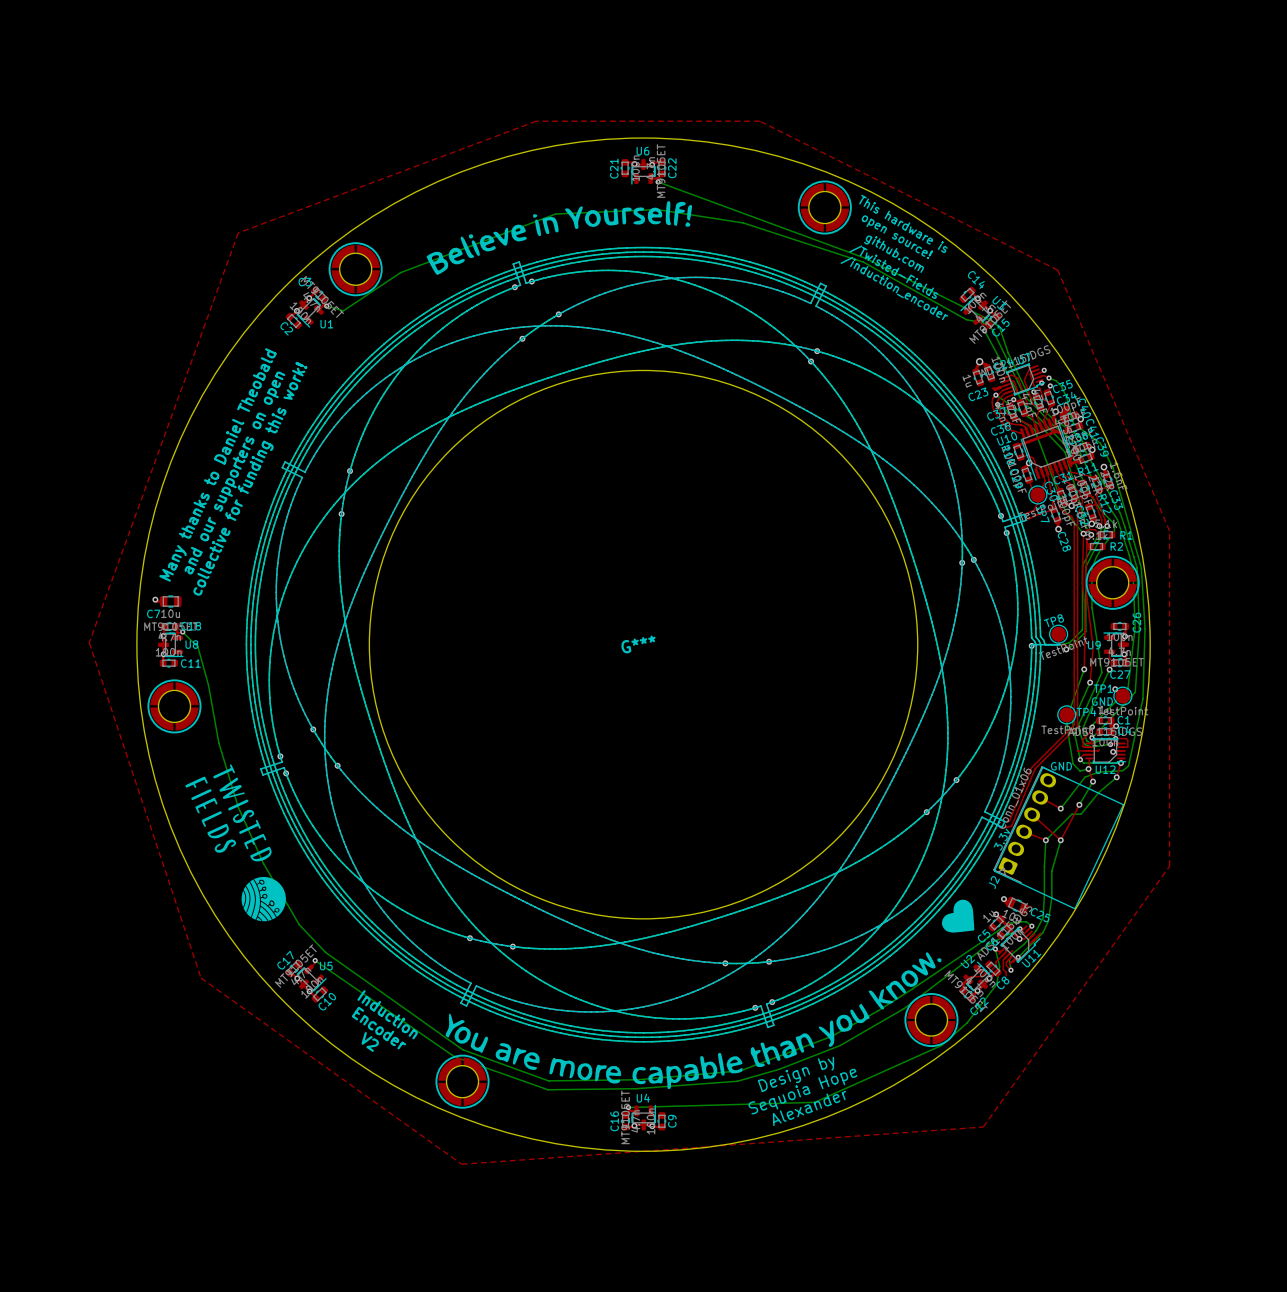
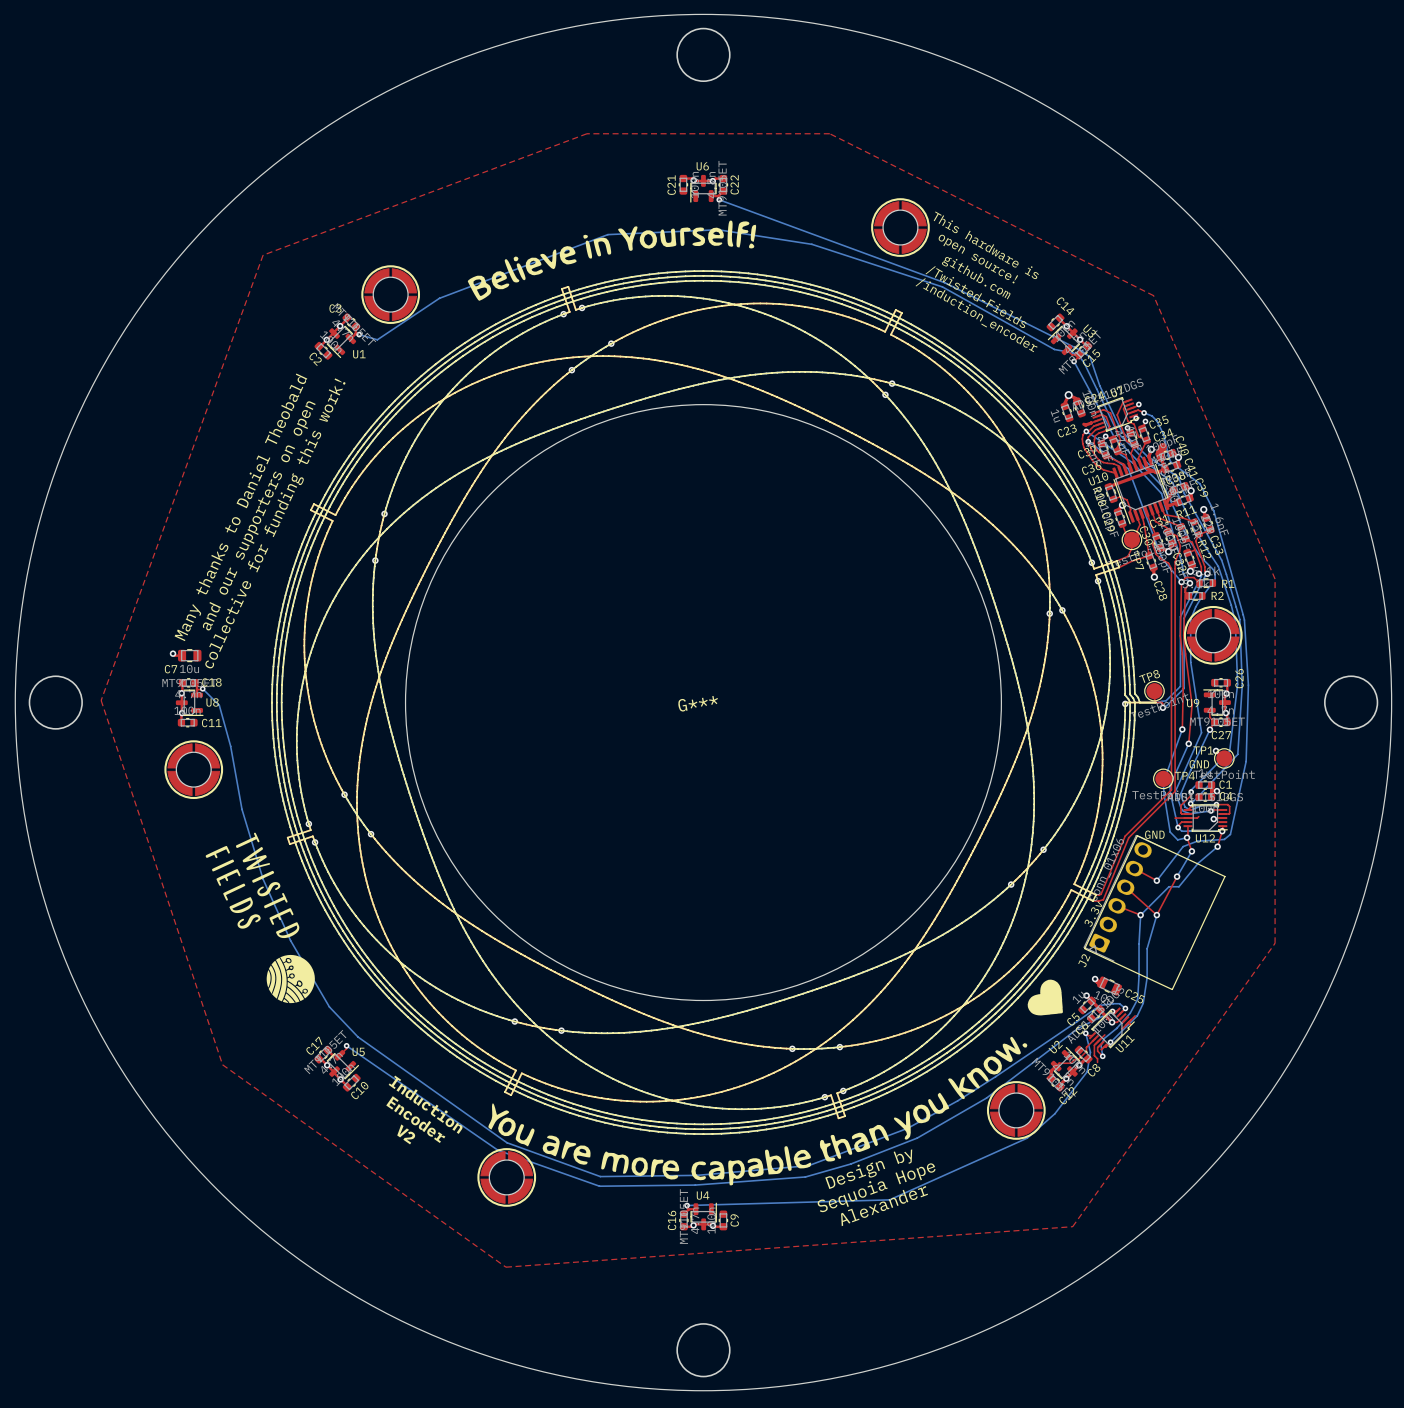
round board edge: none -> [676, 27, 731, 83]
round board edge size: [136, 137, 1151, 1152] -> [15, 14, 1392, 1391]
round board edge: none -> [28, 675, 83, 730]
round board edge: none -> [1324, 675, 1379, 730]
round board edge: none -> [676, 1323, 731, 1378]

